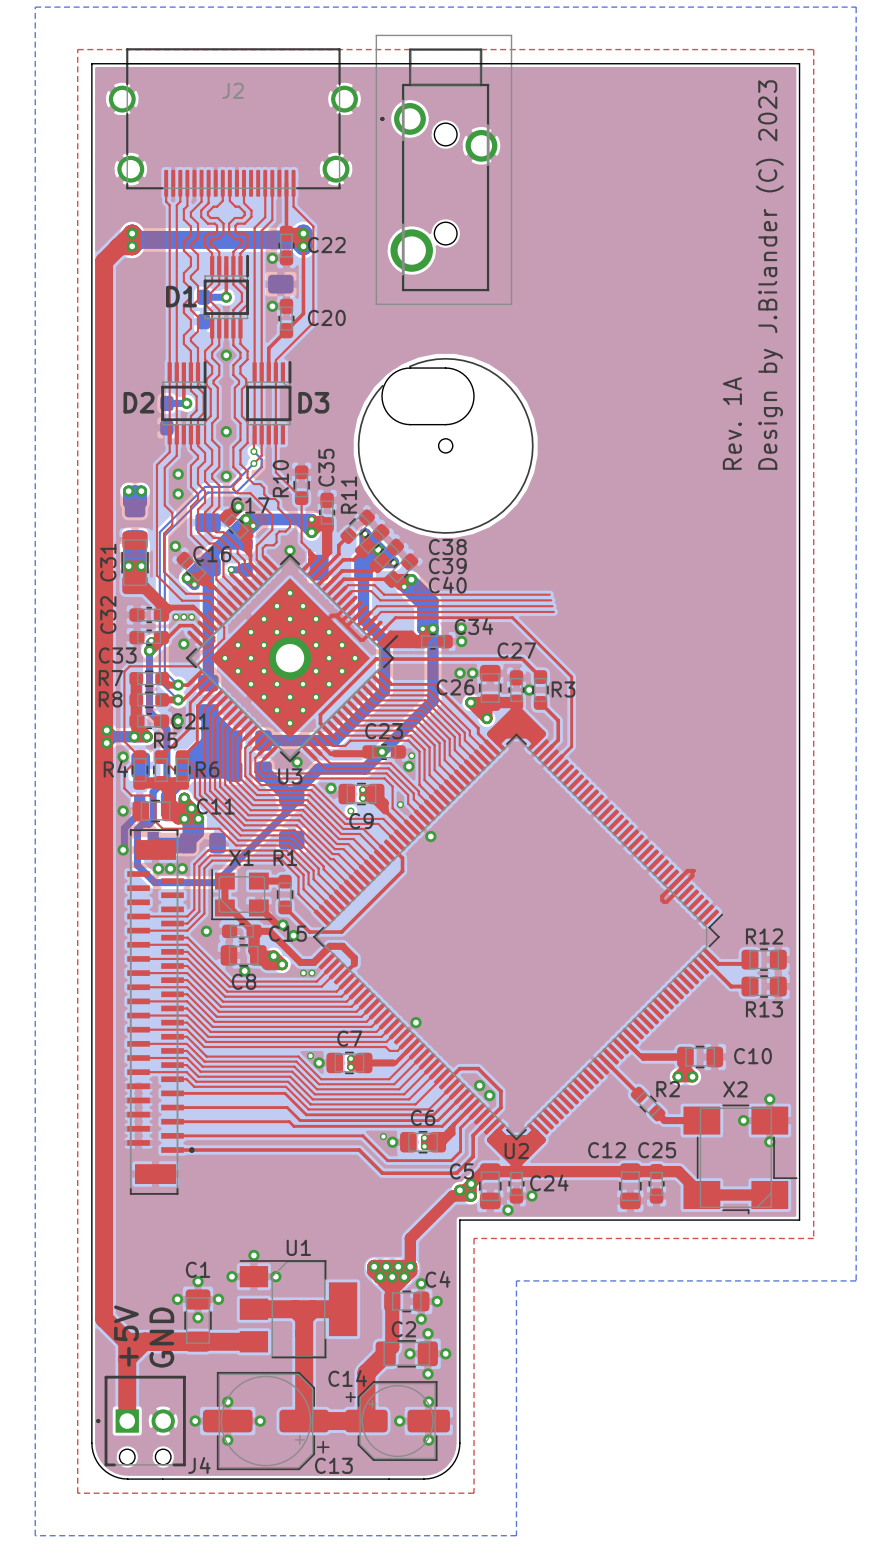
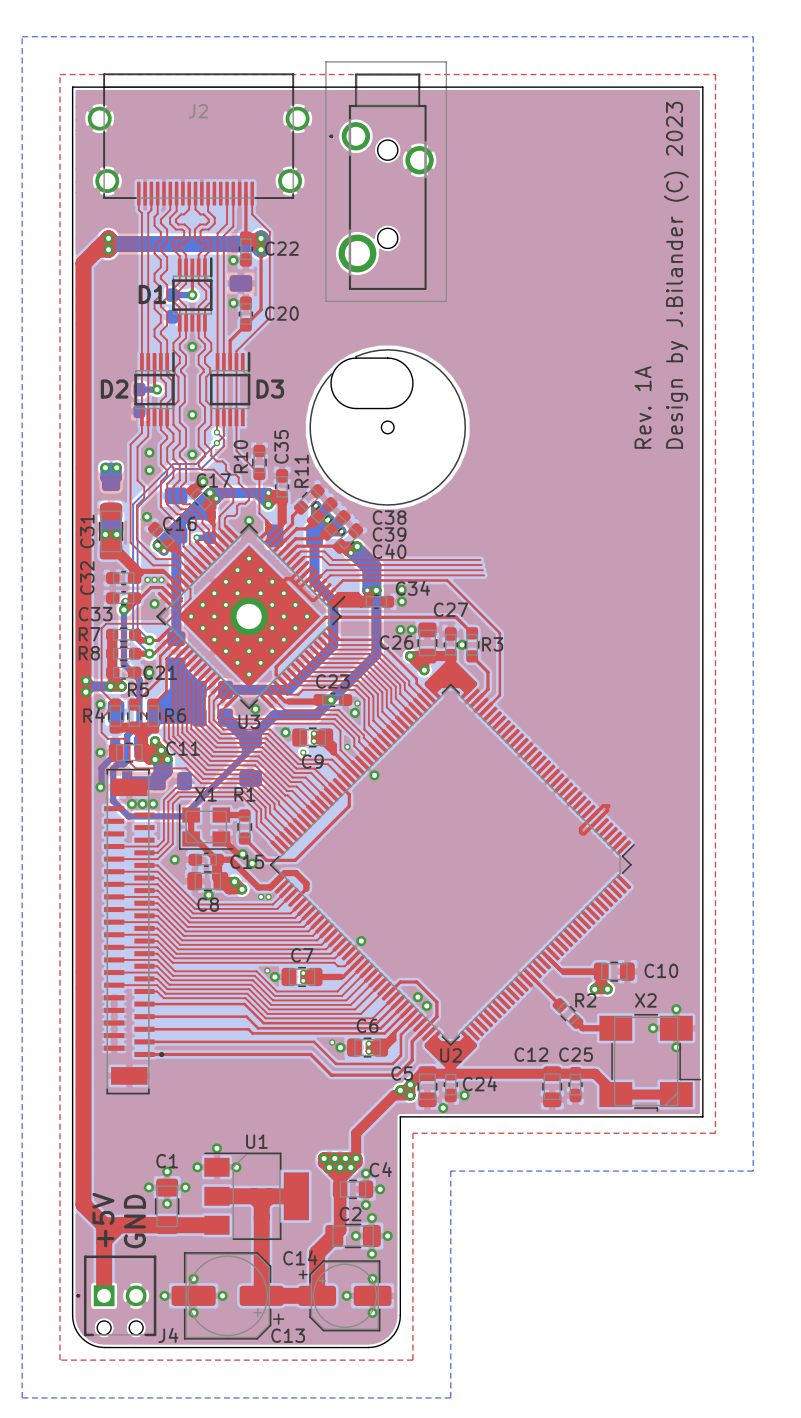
top track: (710, 956) (718, 963) (745, 963) (750, 959) -> none
R12: (764, 959) -> none
top track: (705, 961) (731, 986) (750, 986) -> none
R13: (764, 986) -> none

